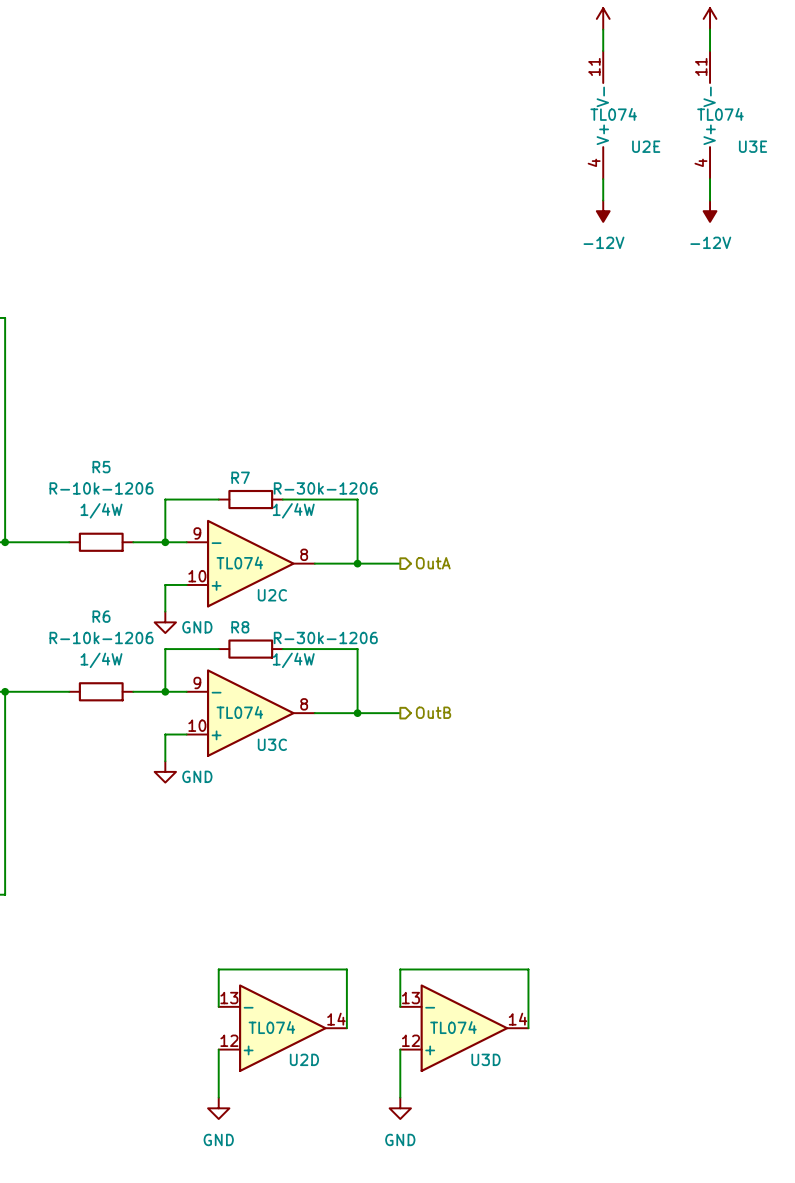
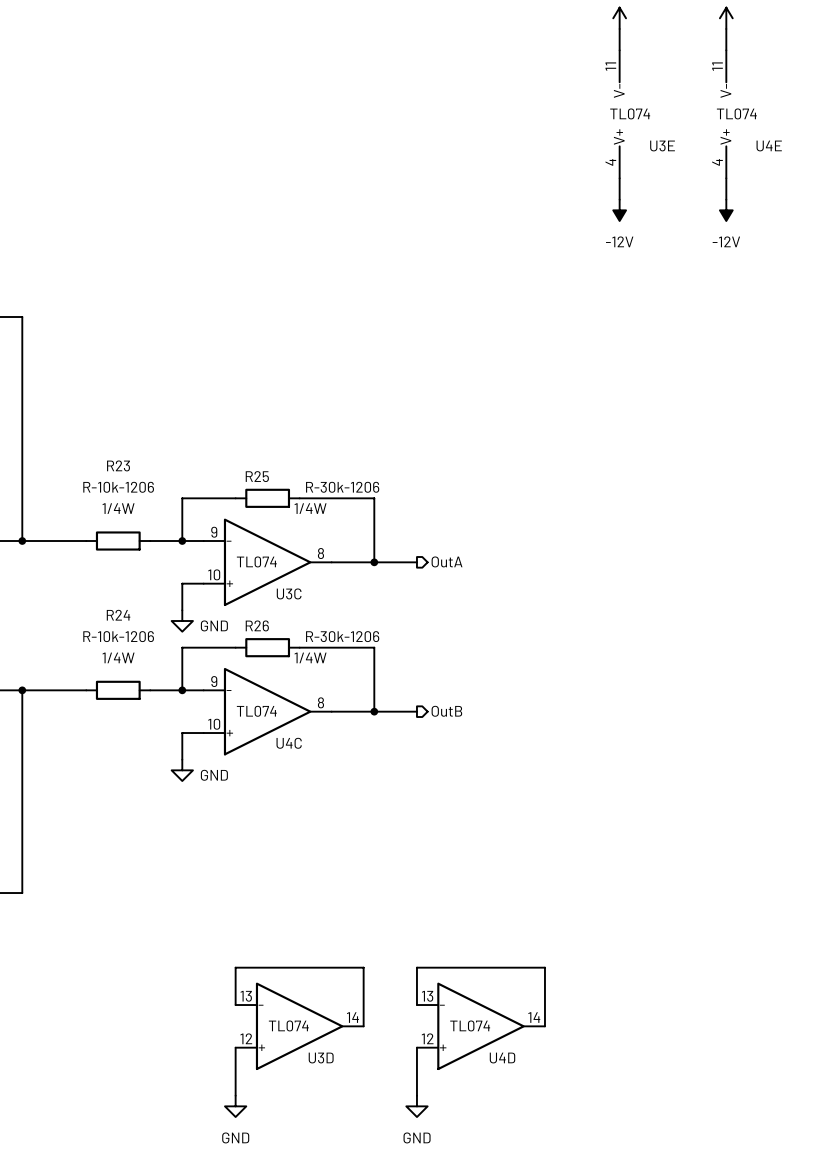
U2E name: U2E (646, 146) -> U3E (662, 145)
U3E name: U3E (753, 146) -> U4E (769, 145)
R5 name: R5 (101, 467) -> R23 (118, 465)
R7 name: R7 (240, 477) -> R25 (257, 476)
U2C name: U2C (272, 595) -> U3C (289, 593)
R6 name: R6 (101, 616) -> R24 (118, 615)
R8 name: R8 (240, 627) -> R26 (257, 625)
U3C name: U3C (272, 744) -> U4C (289, 743)
U2D name: U2D (304, 1059) -> U3D (321, 1058)
U3D name: U3D (485, 1059) -> U4D (502, 1058)

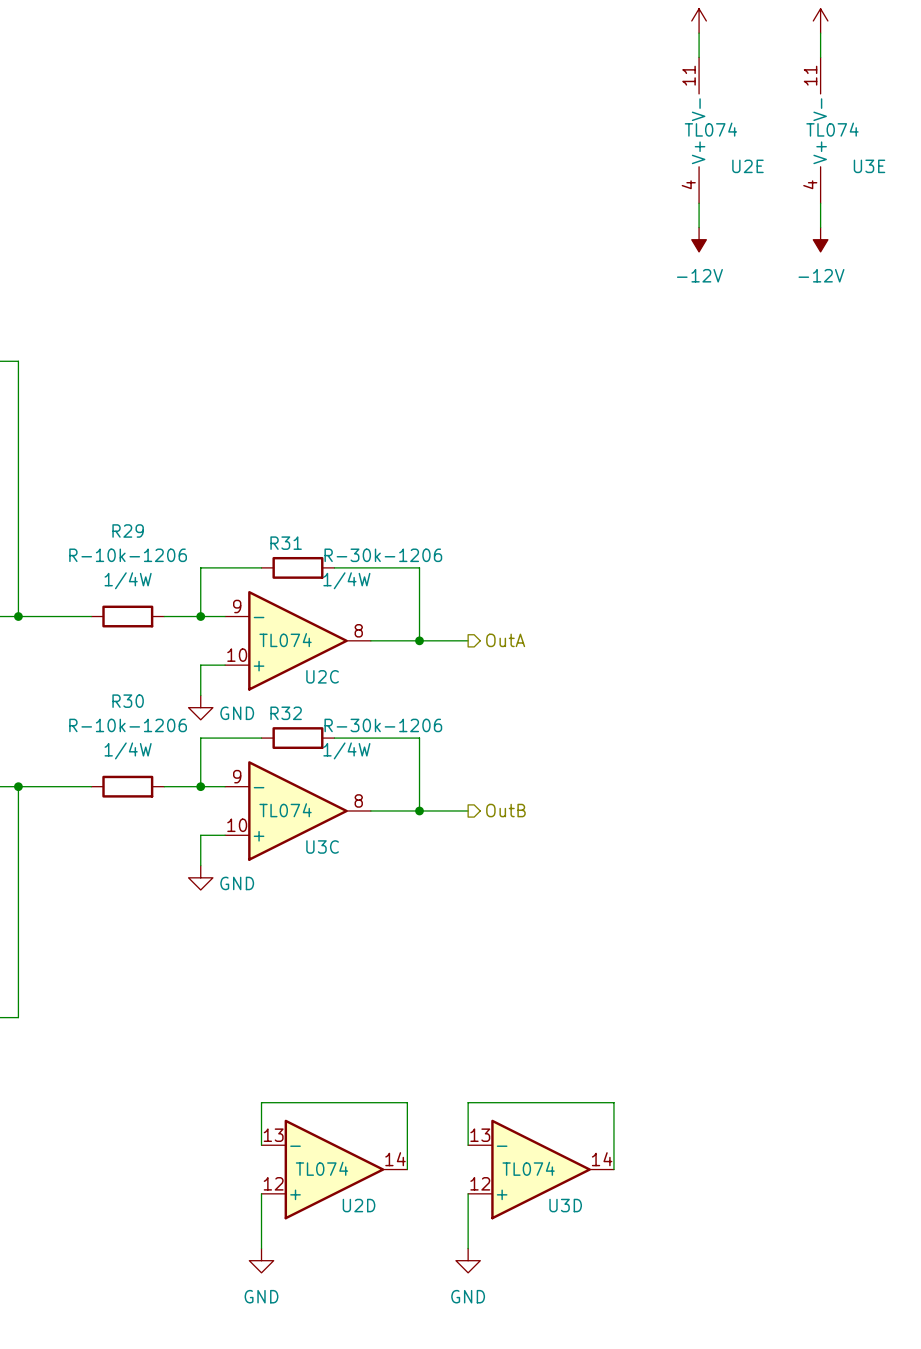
U3E name: U3E (662, 145) -> U2E (747, 166)
U4E name: U4E (769, 145) -> U3E (869, 166)
R23 name: R23 (118, 465) -> R29 (128, 530)
R25 name: R25 (257, 476) -> R31 (286, 543)
U3C name: U3C (289, 593) -> U2C (322, 676)
R24 name: R24 (118, 615) -> R30 (128, 701)
R26 name: R26 (257, 625) -> R32 (286, 713)
U4C name: U4C (289, 743) -> U3C (322, 847)
U3D name: U3D (321, 1058) -> U2D (359, 1205)
U4D name: U4D (502, 1058) -> U3D (565, 1205)

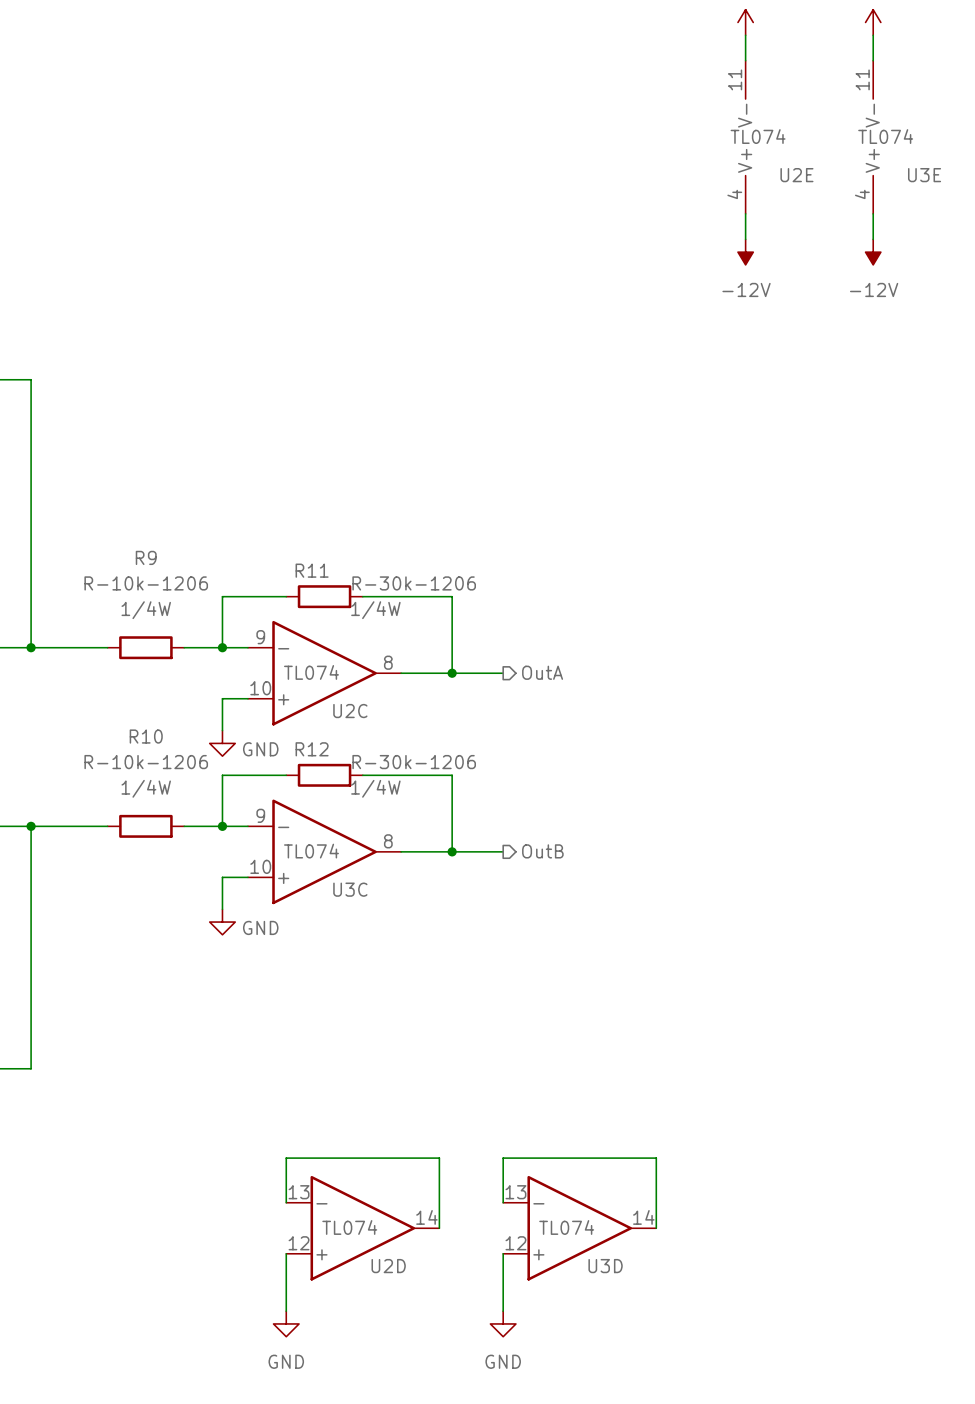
R29 name: R29 (128, 530) -> R9 (146, 557)
R31 name: R31 (286, 543) -> R11 (312, 570)
R30 name: R30 (128, 701) -> R10 (146, 736)
R32 name: R32 (286, 713) -> R12 (312, 749)

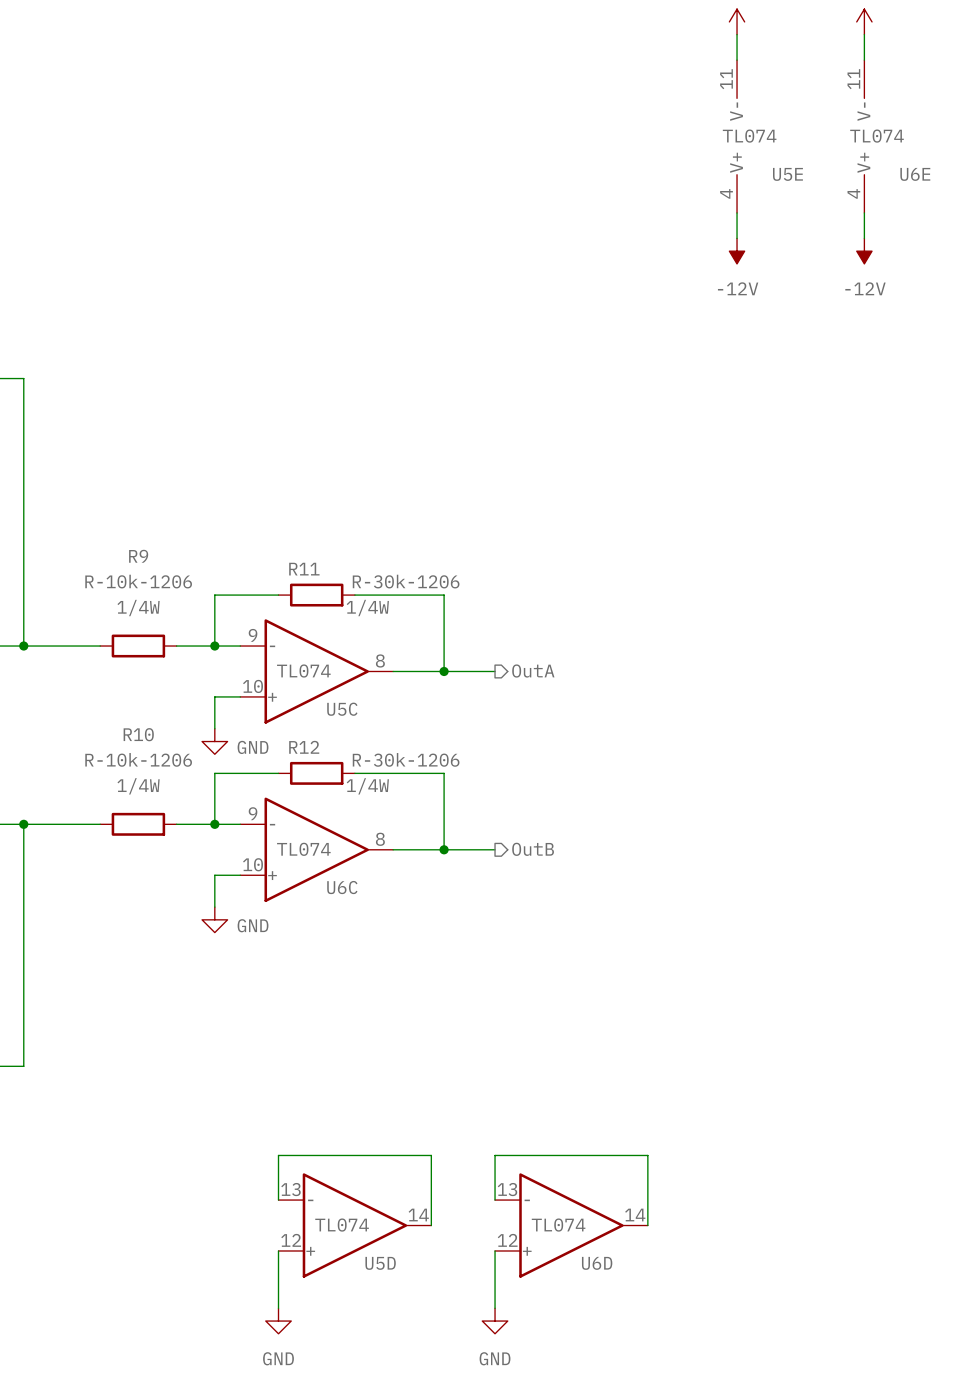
U2E name: U2E (796, 175) -> U5E (787, 174)
U3E name: U3E (924, 175) -> U6E (915, 174)
U2C name: U2C (350, 711) -> U5C (342, 709)
U3C name: U3C (350, 889) -> U6C (342, 887)
U2D name: U2D (388, 1266) -> U5D (380, 1263)
U3D name: U3D (605, 1266) -> U6D (597, 1263)

